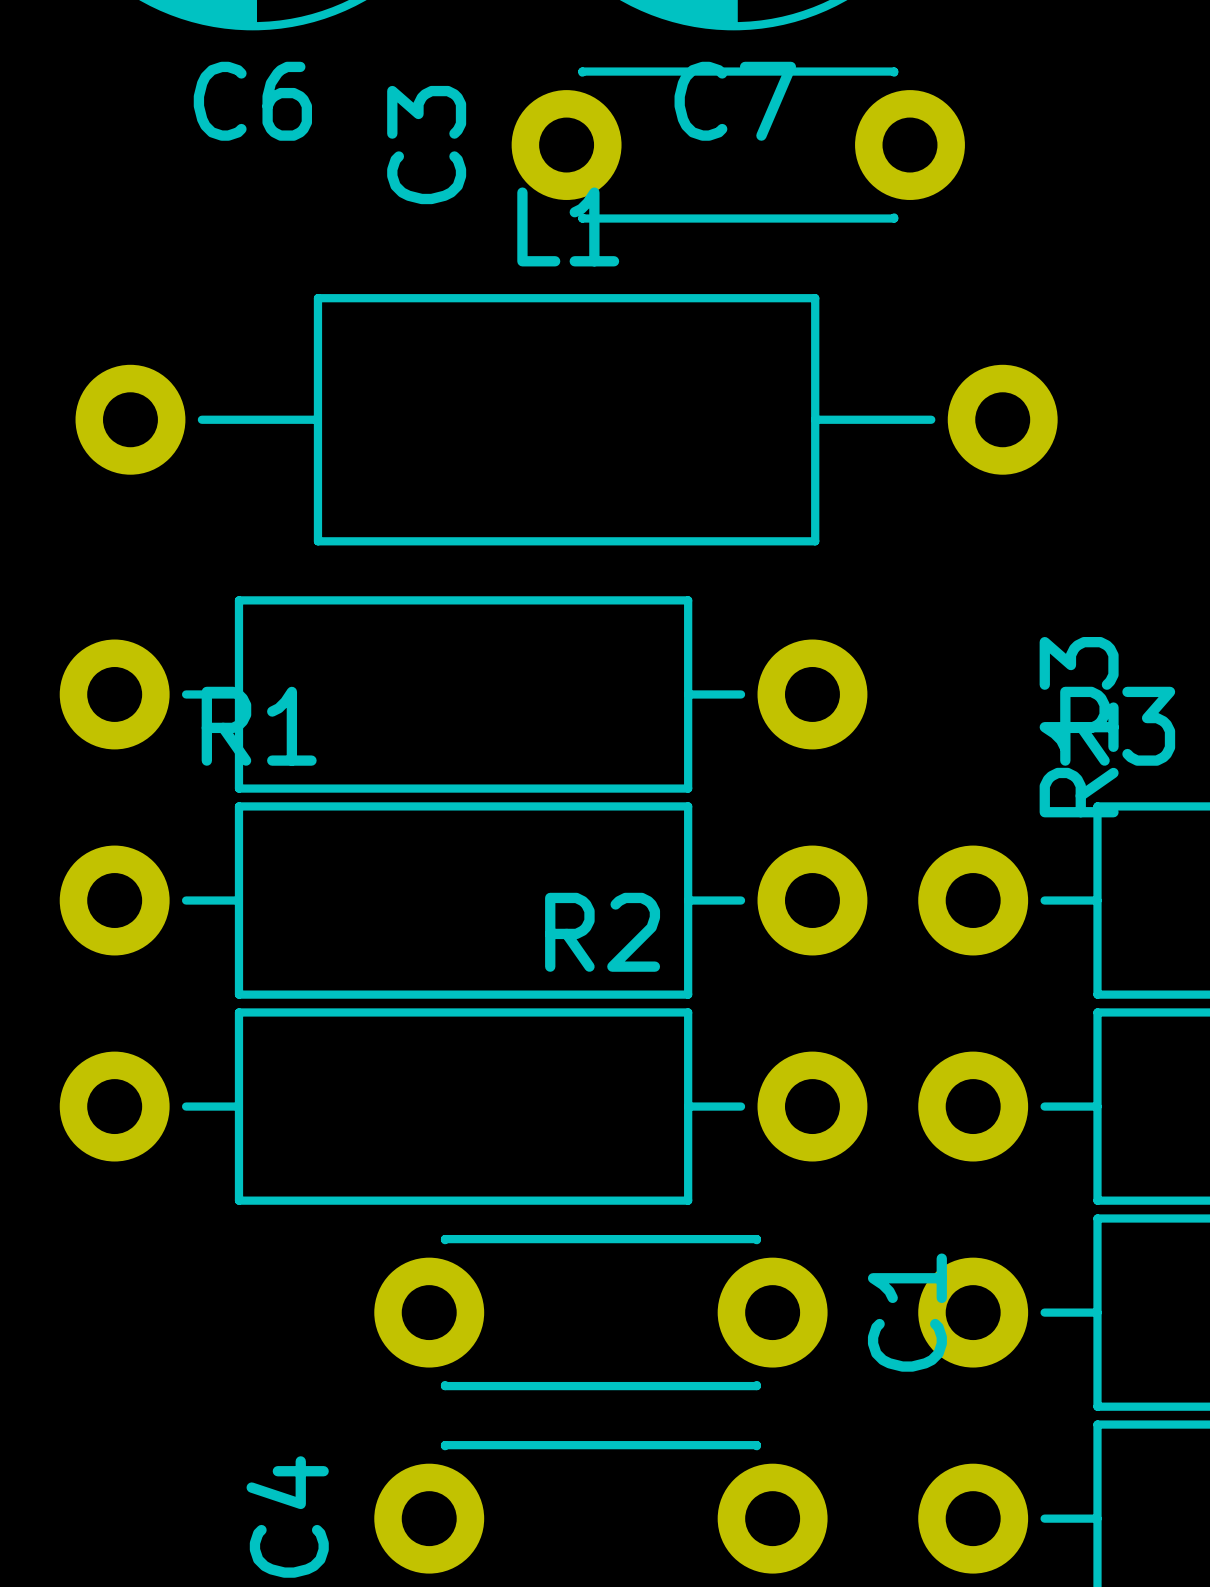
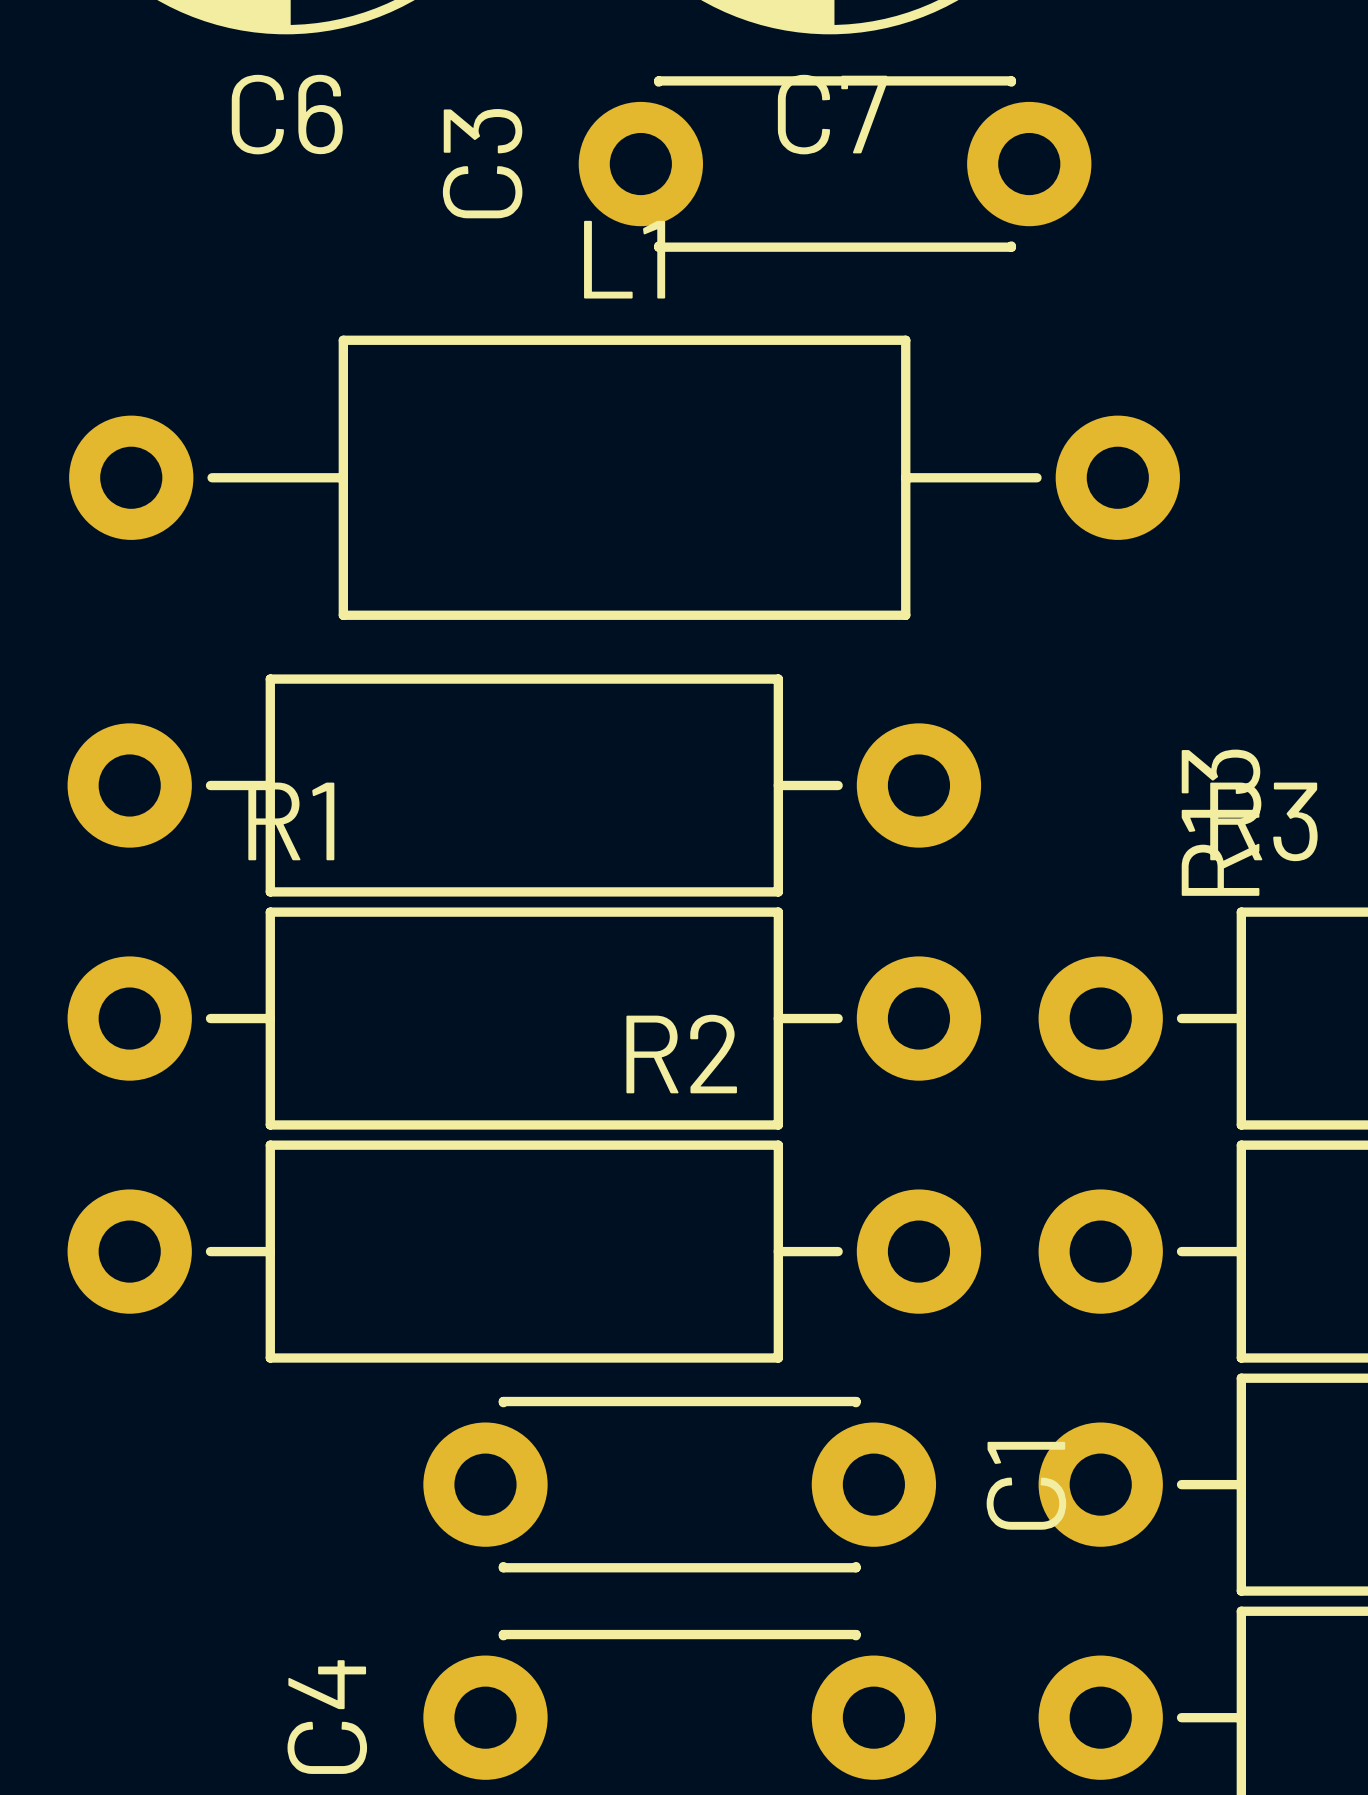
L1 position: (566, 419) -> (624, 477)

